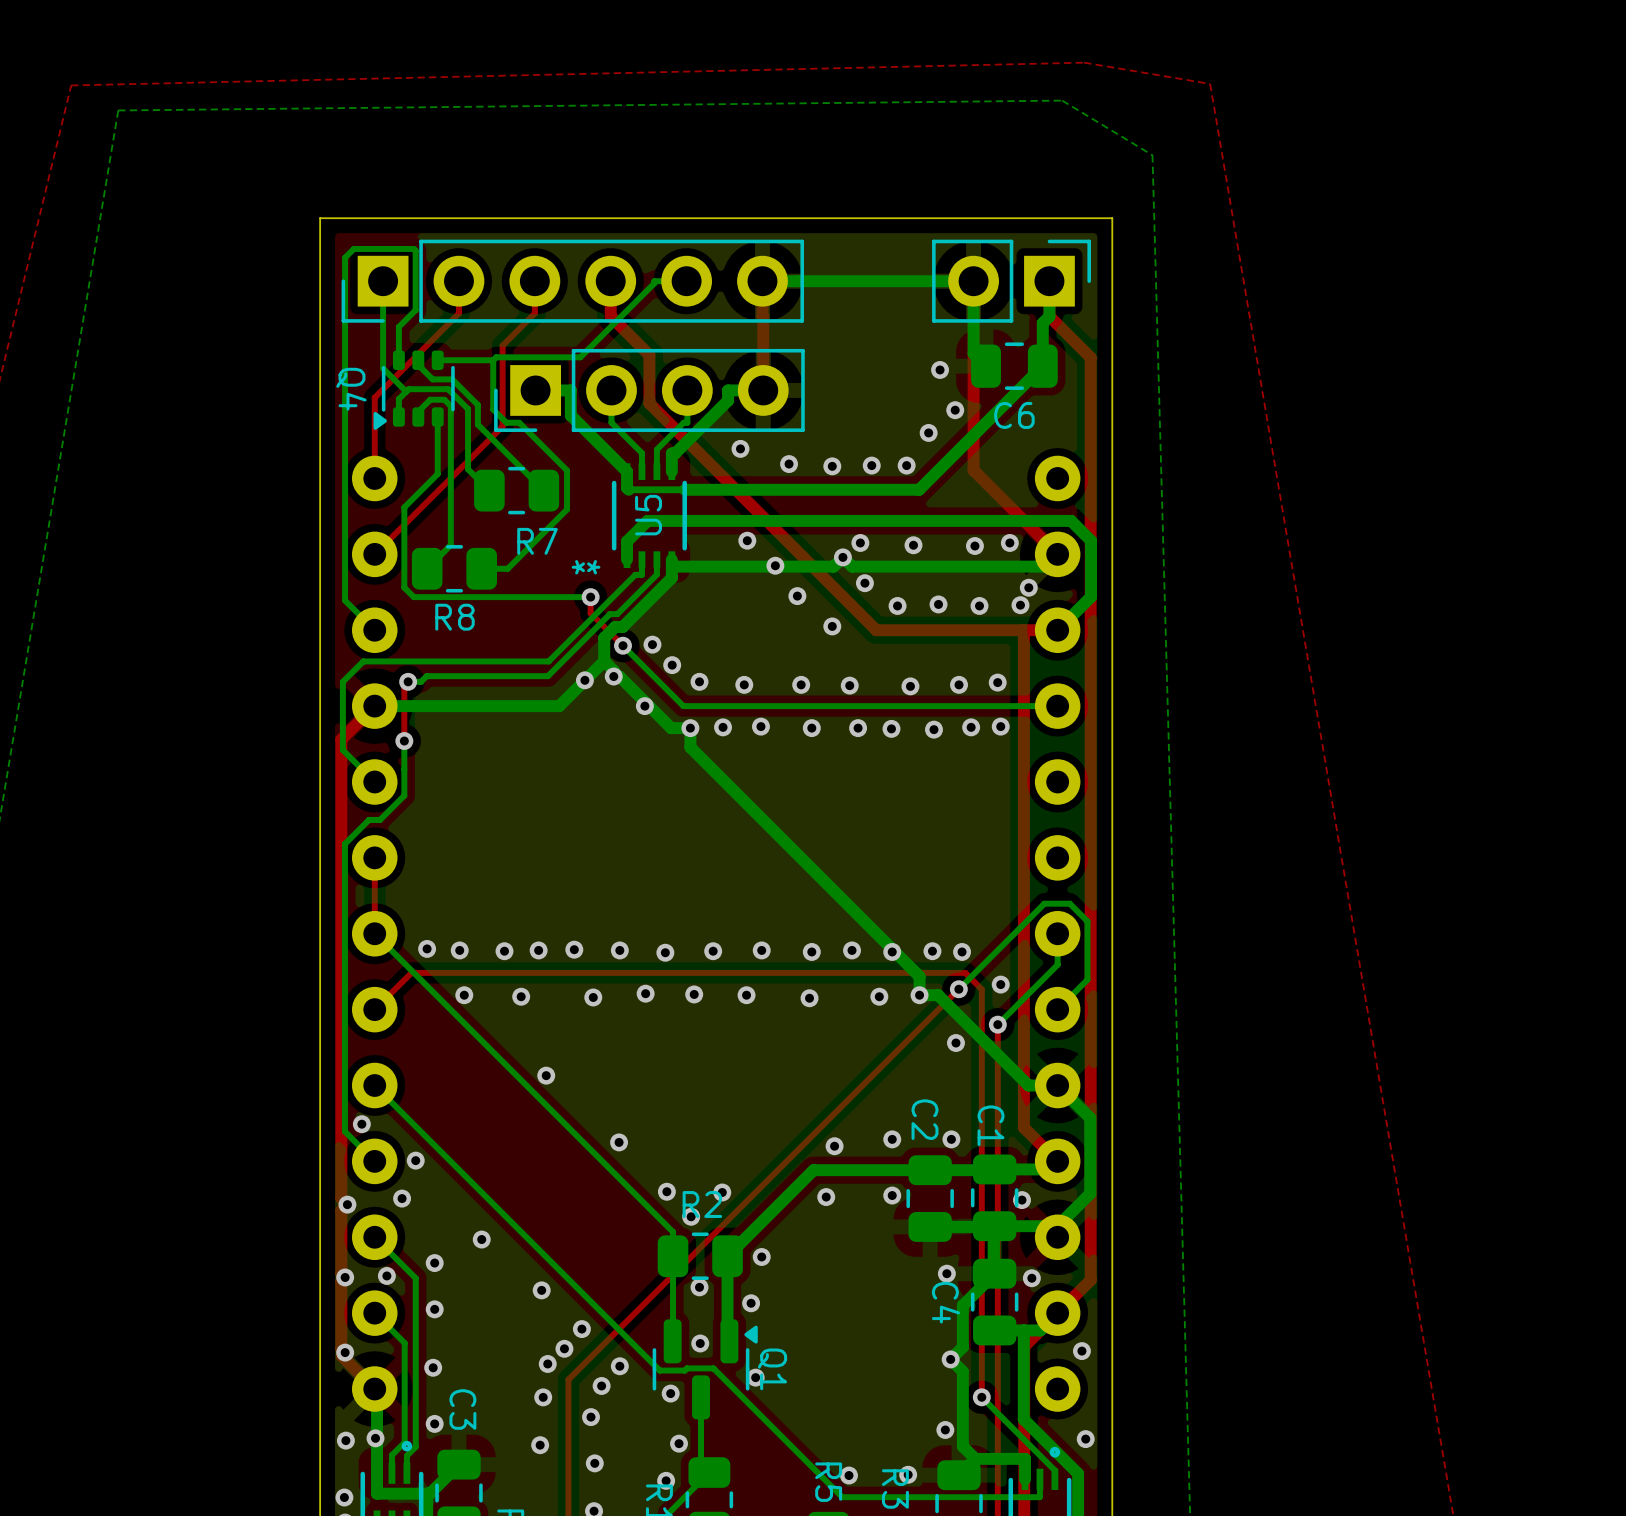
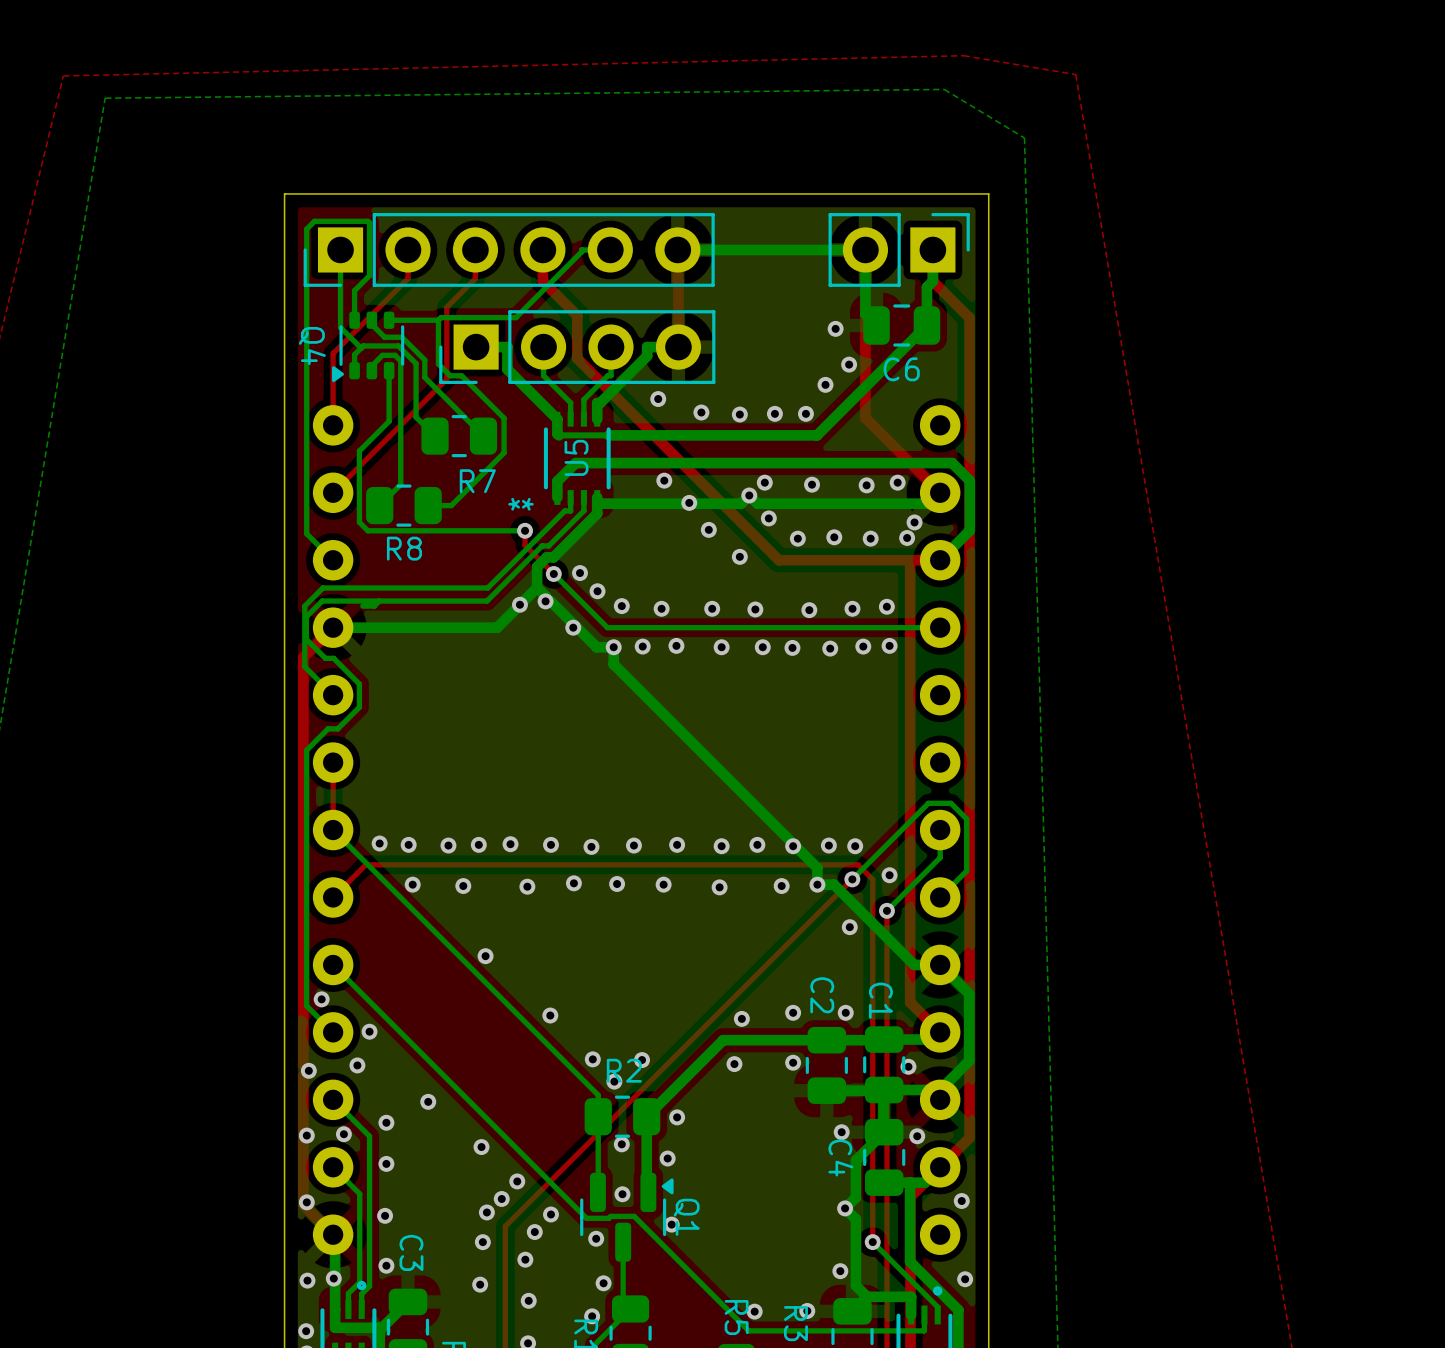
top track: (408, 681) (404, 685) (404, 741) -> none
via: (408, 681) -> none
bottom track: (404, 741) (404, 769) -> (379, 601) (322, 601) (306, 616) (306, 639) (325, 658) (333, 658) (359, 684)
via: (404, 741) -> none

